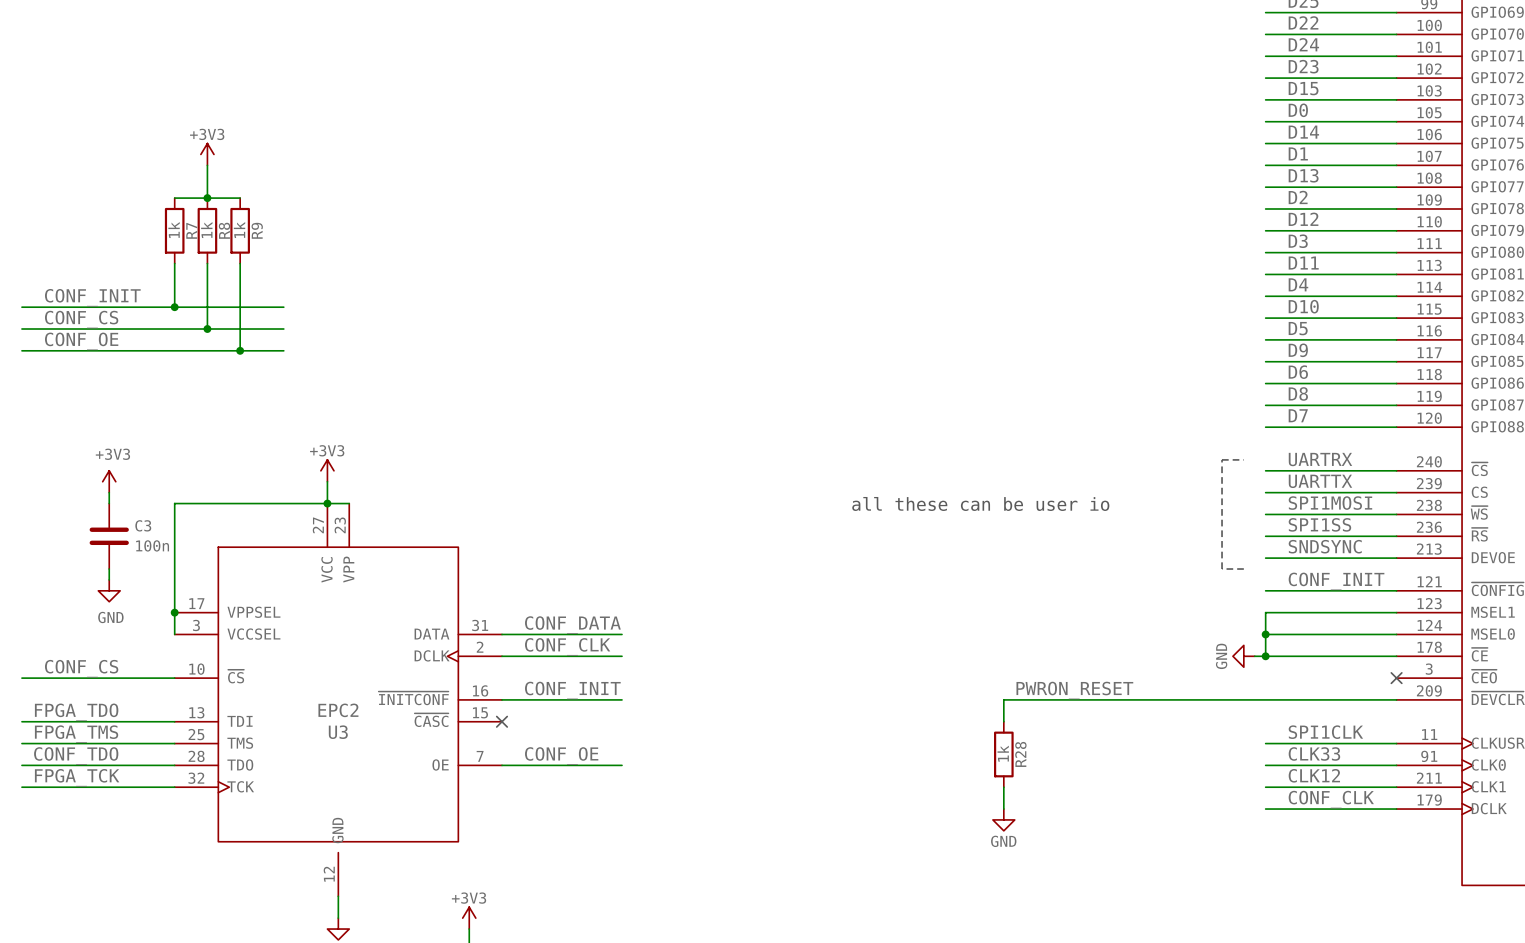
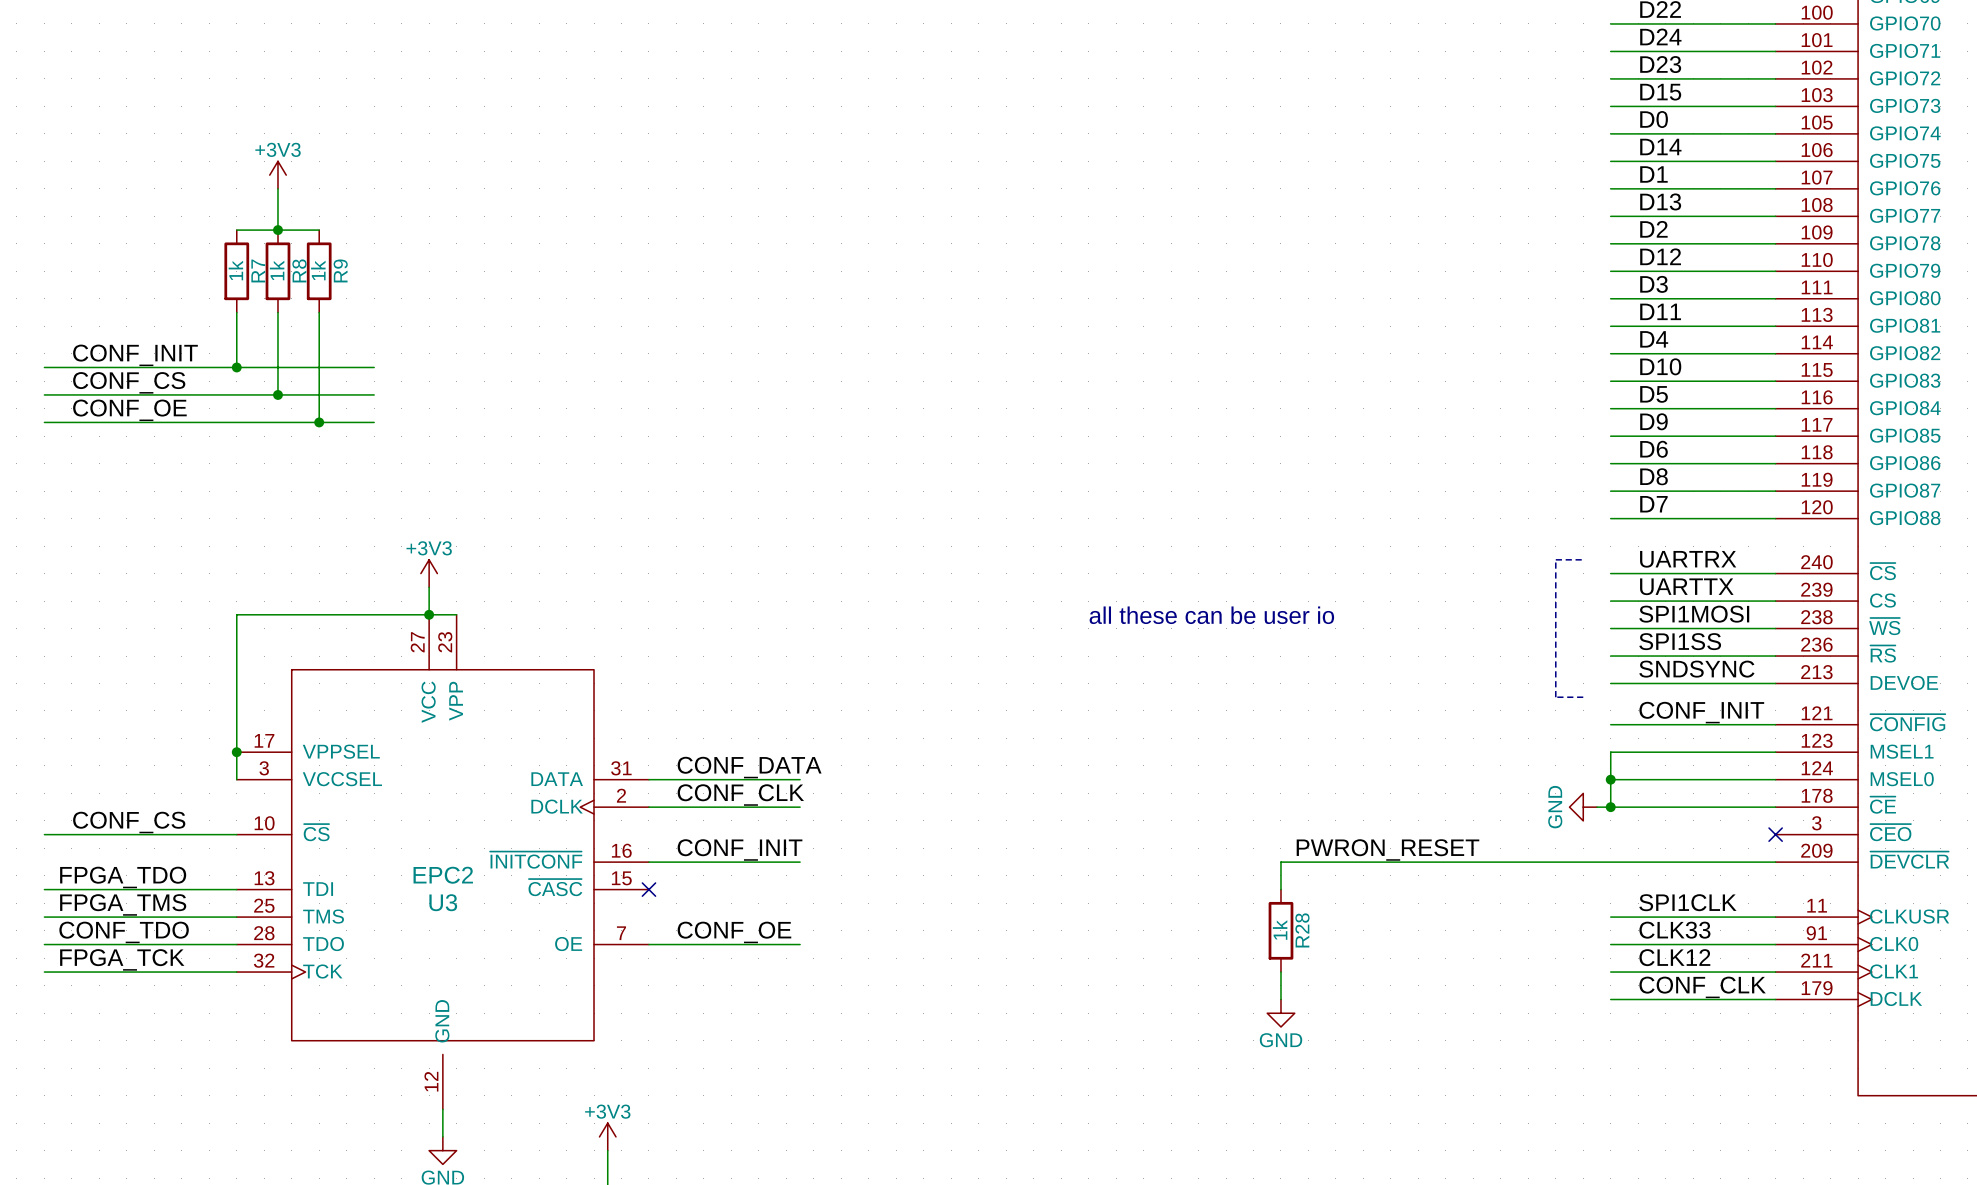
power symbol: +3V3 (109, 481) -> none
wire: (109, 492) (109, 503) -> none
C3: 100n (109, 536) -> none
wire: (109, 569) (109, 579) -> none
power symbol: GND (109, 590) -> none

